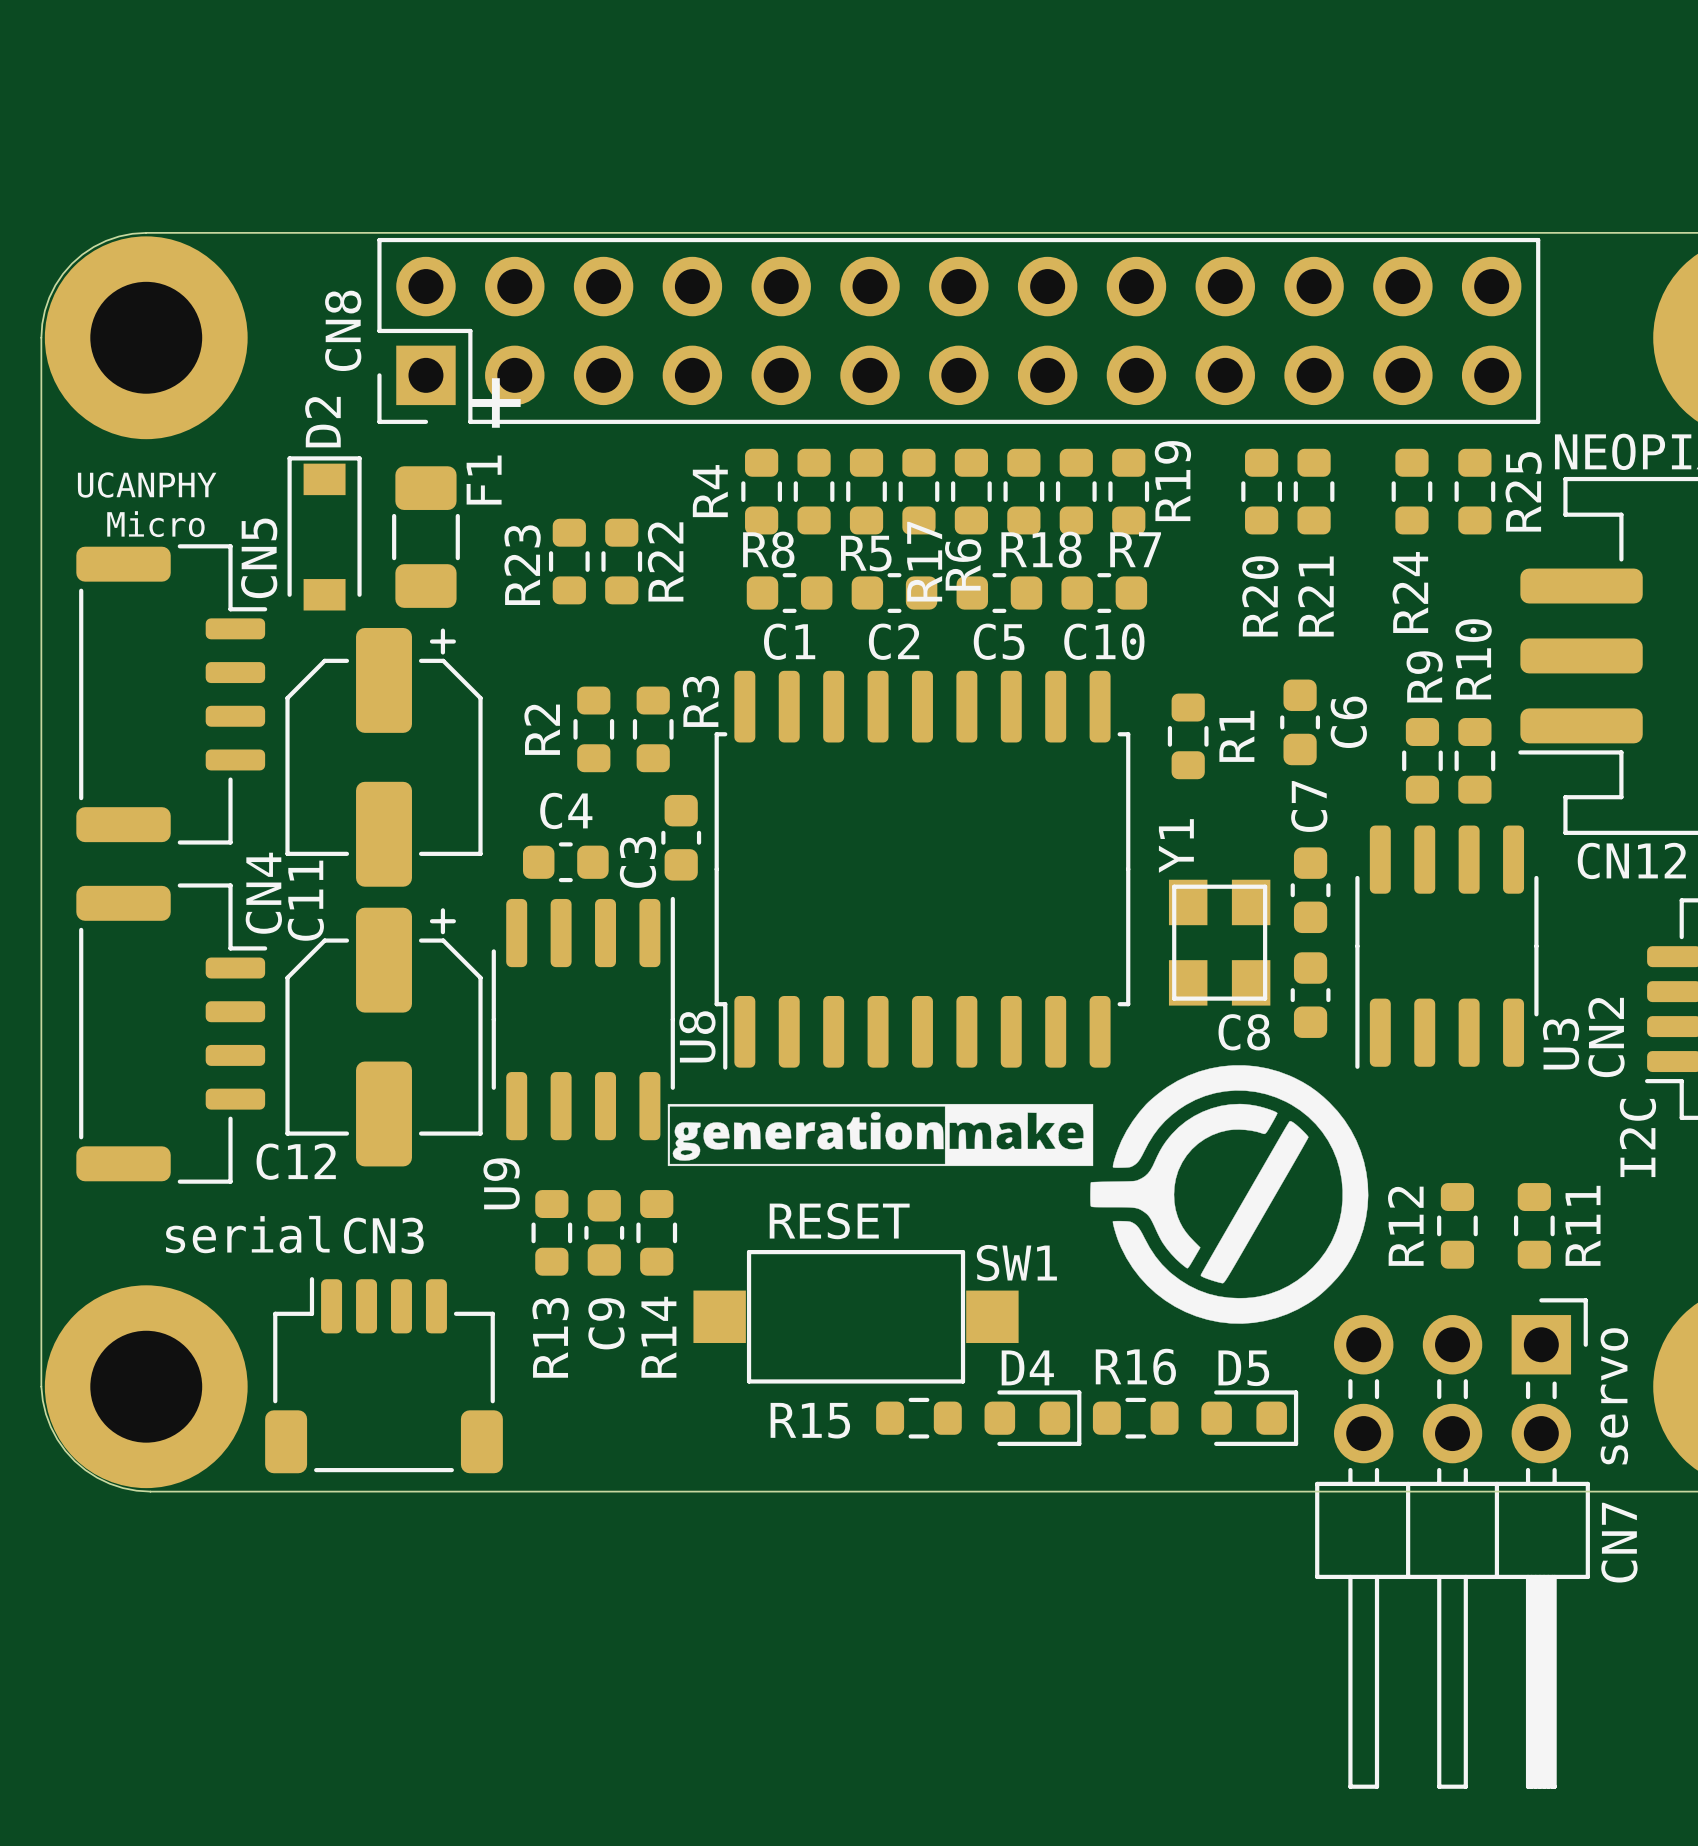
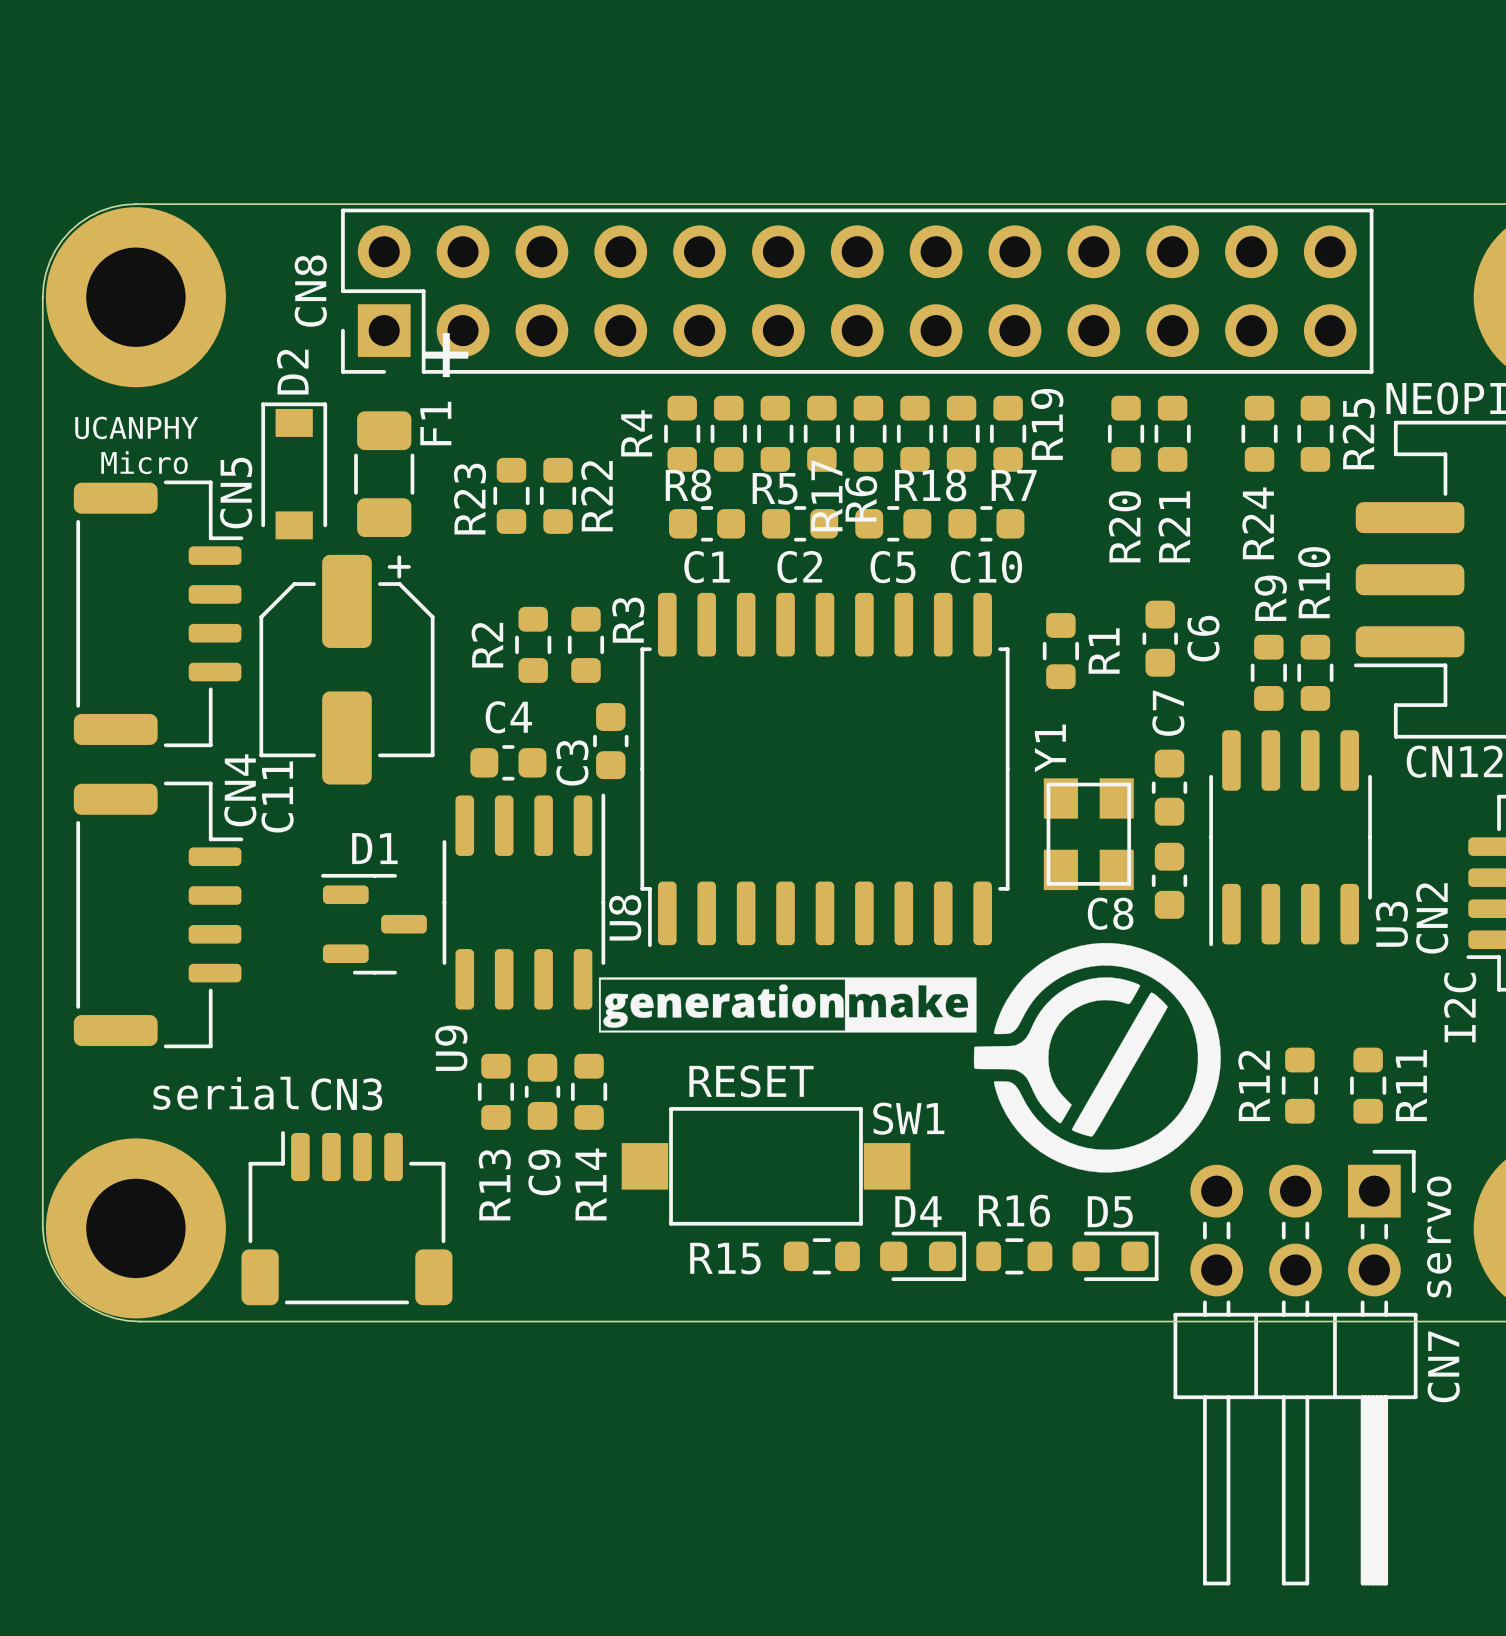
C12: (384, 1037) -> none
D1: none -> (373, 924)

